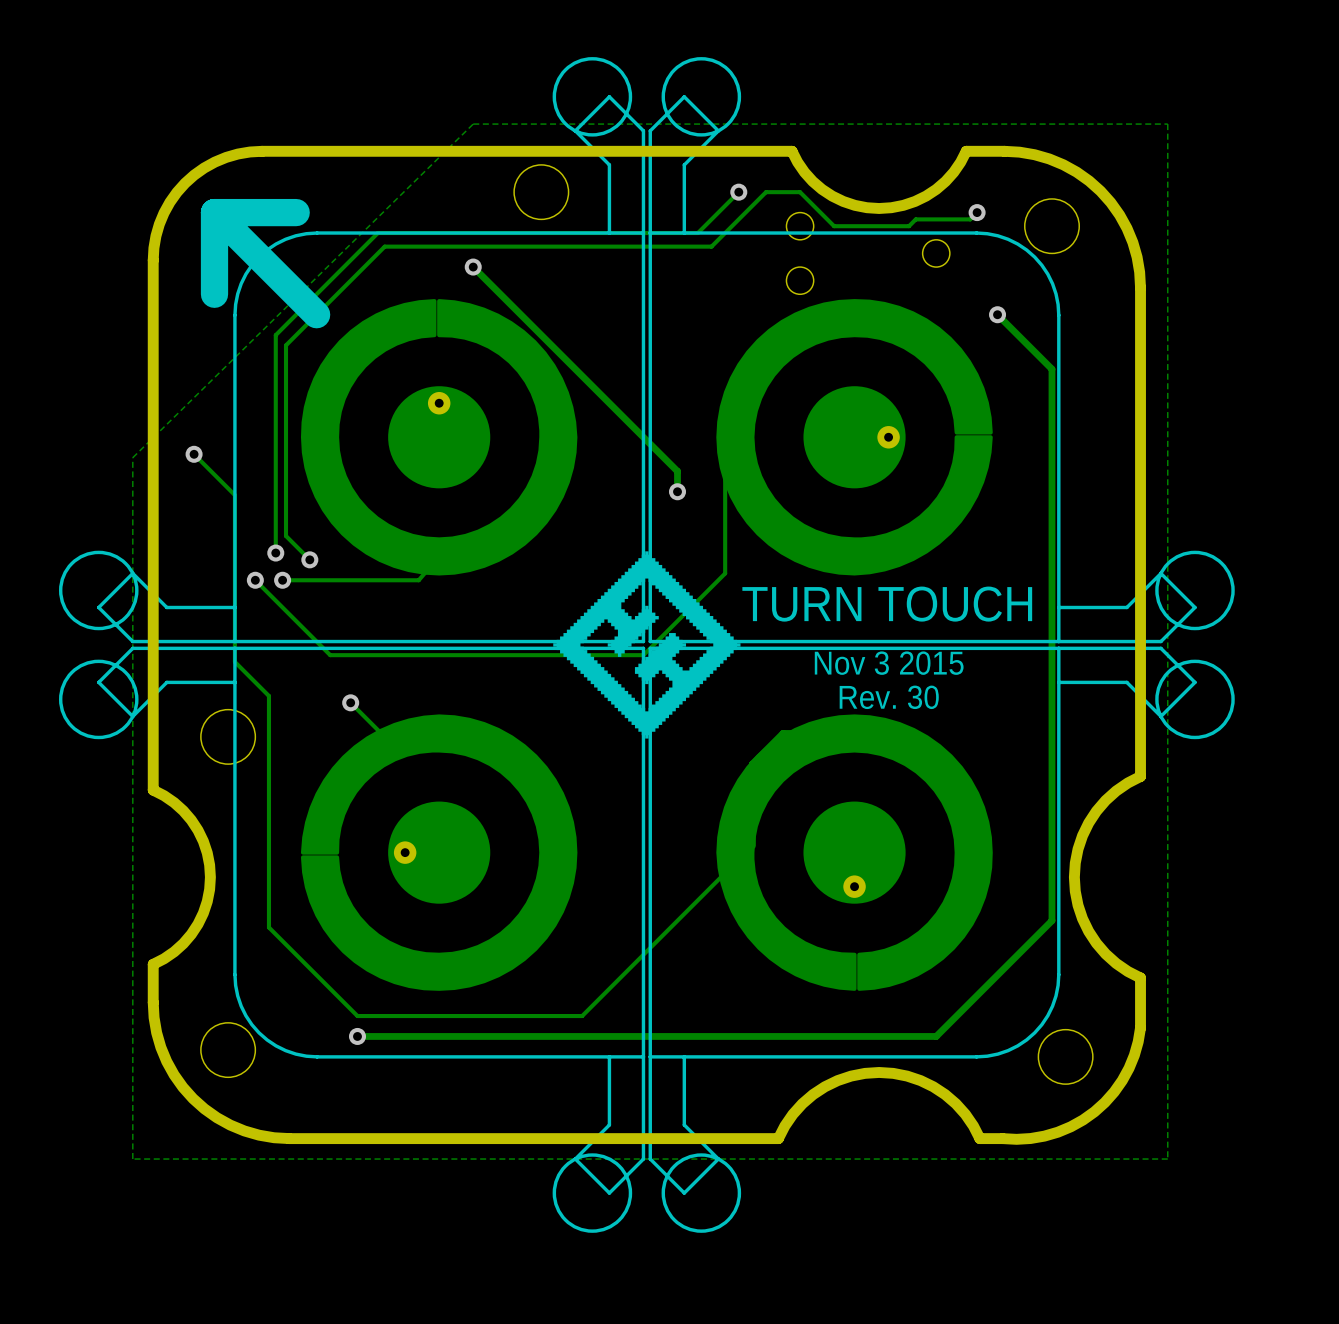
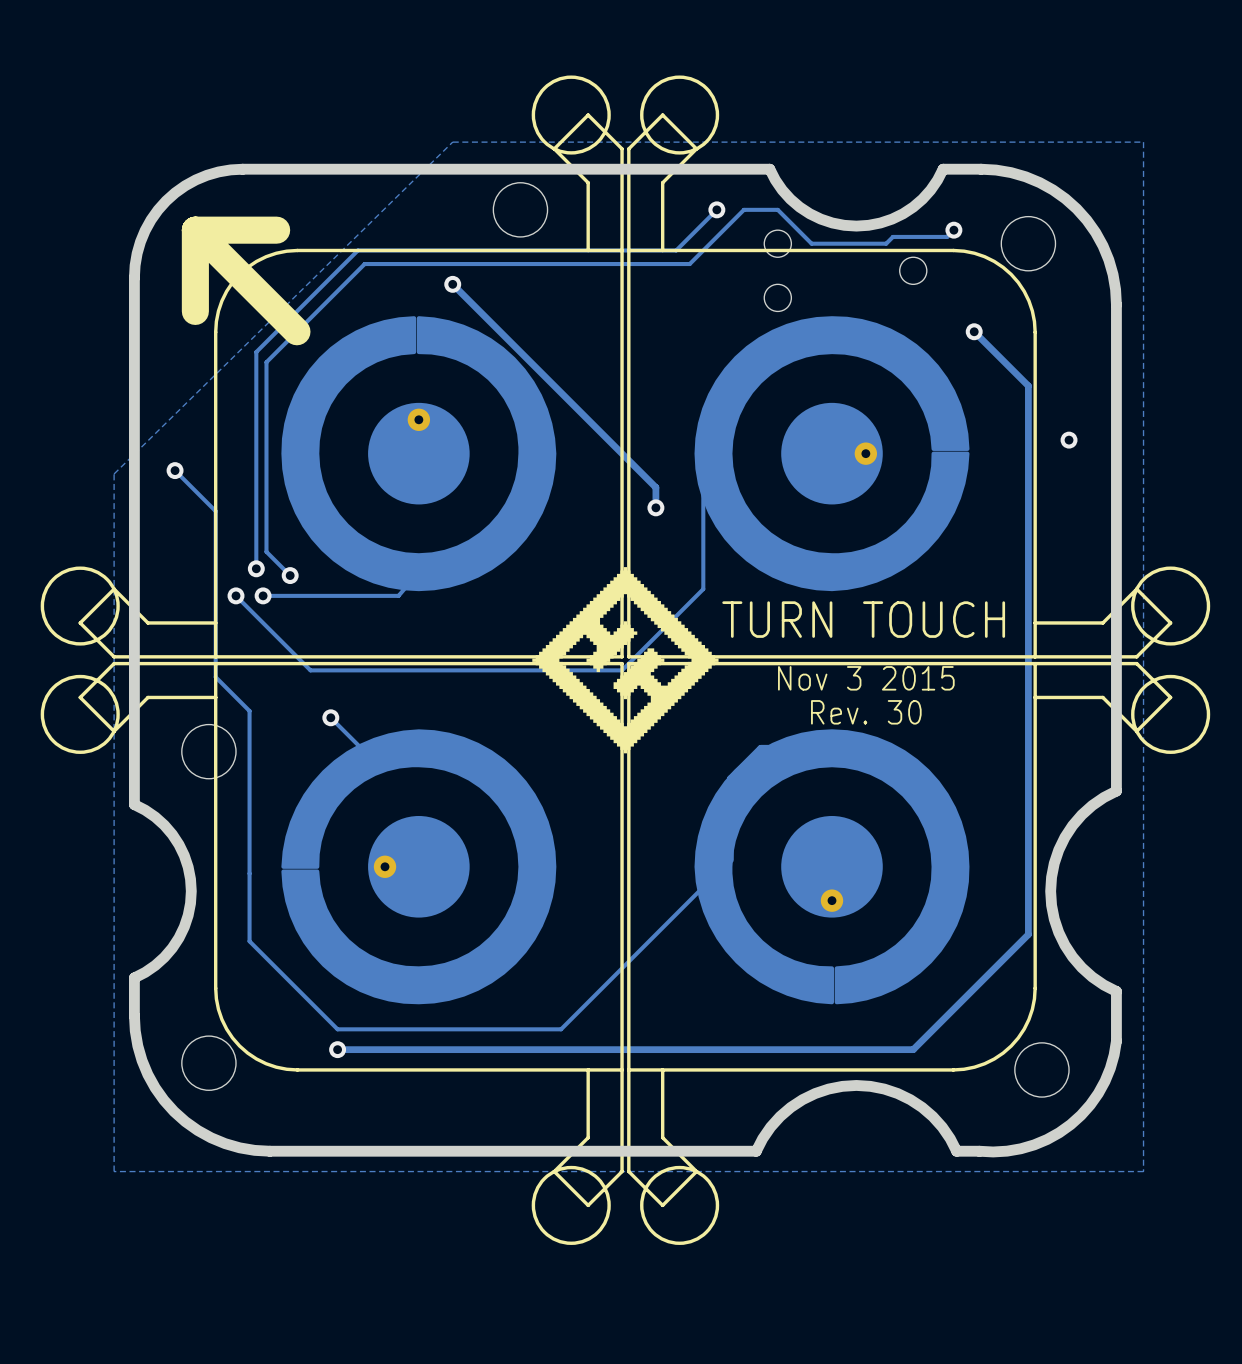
via: none -> (1069, 440)

